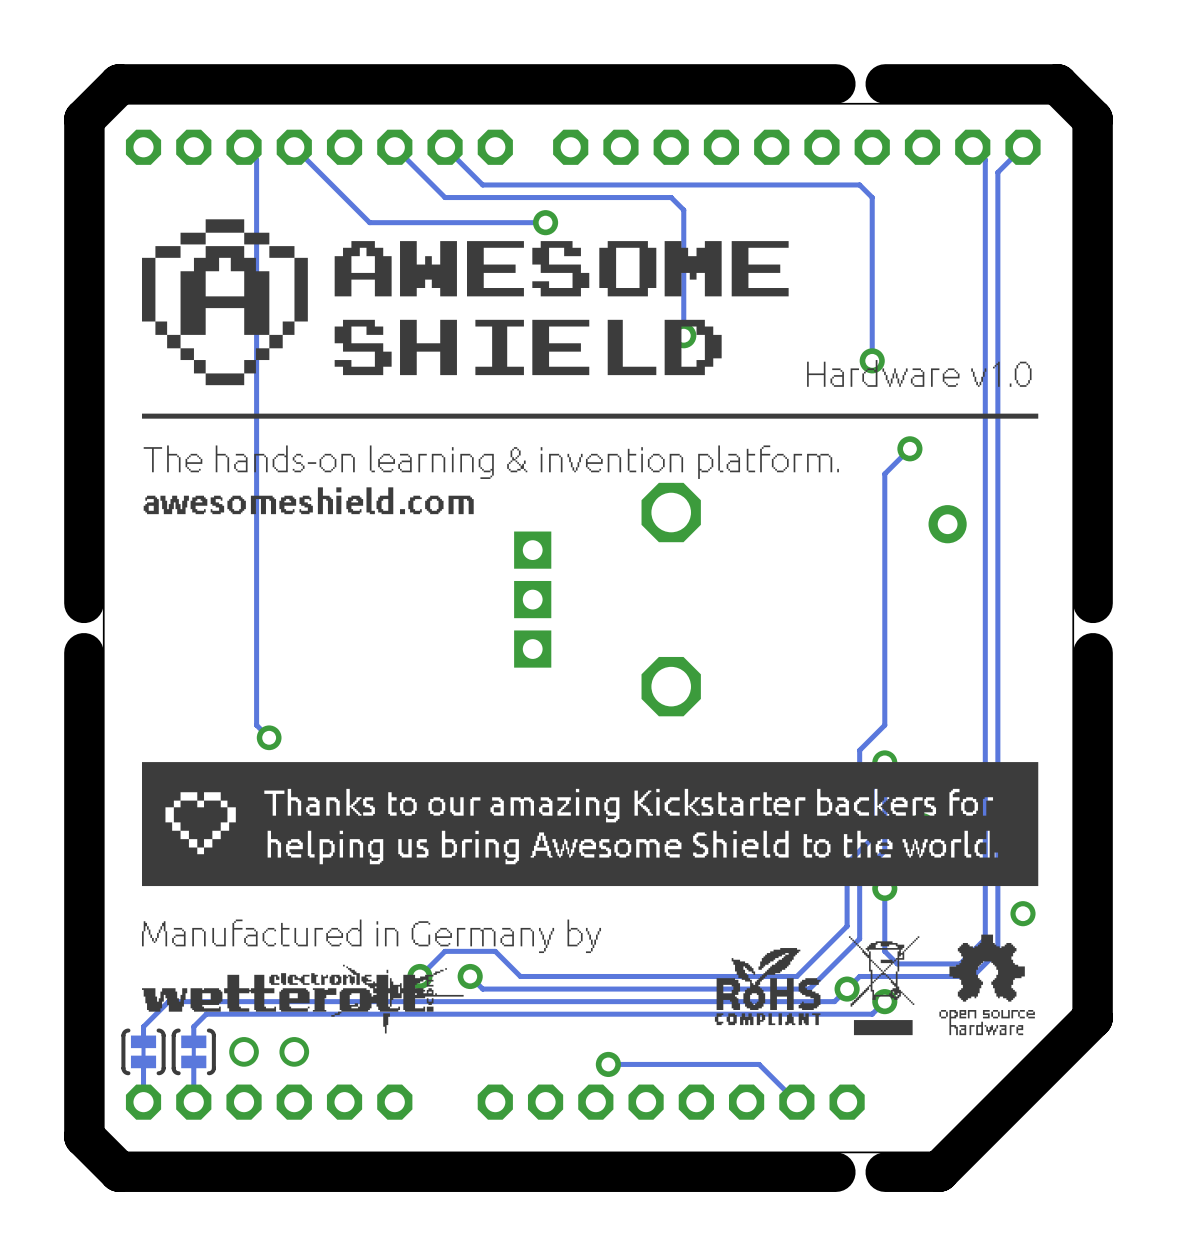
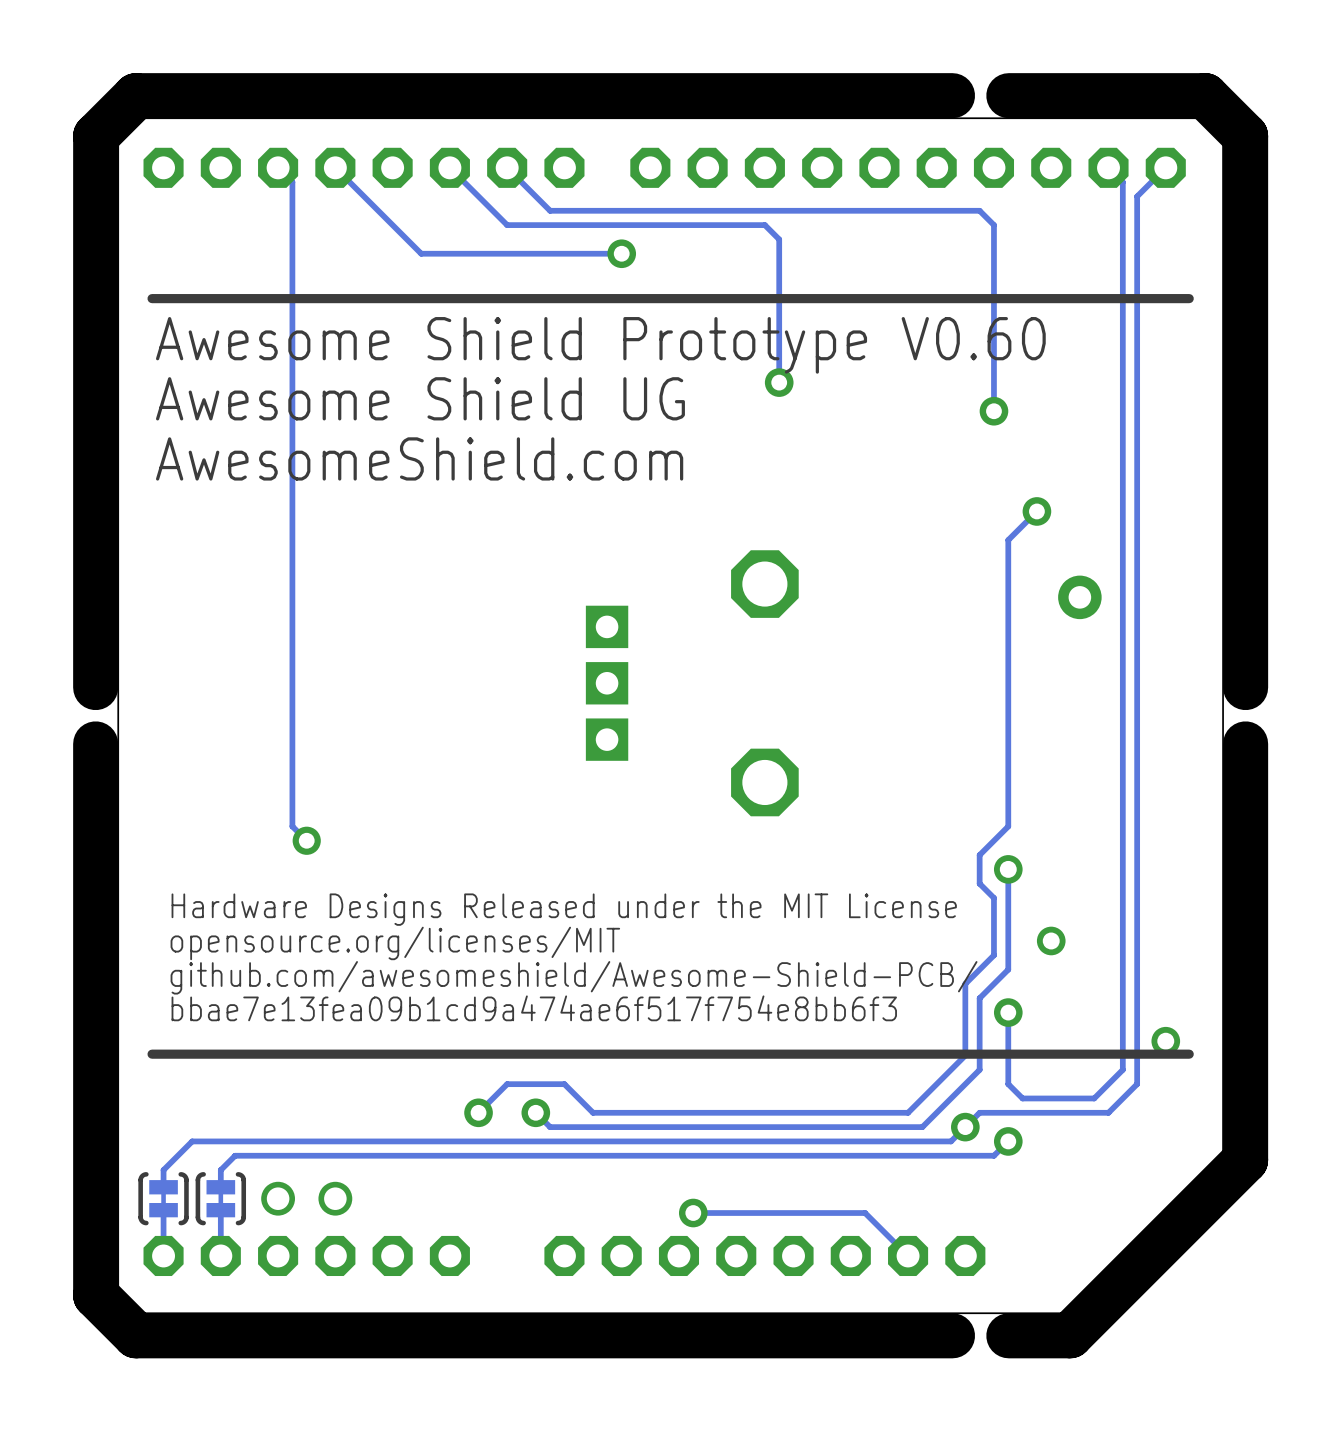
drawing: [141, 219, 308, 386] -> none
drawing: [334, 241, 789, 376] -> none
line: none -> (1189, 298) (152, 298)
text: none -> Awesome Shield Prototype V0.60 (600, 345)
text: none -> Awesome Shield UG (420, 398)
drawing: [807, 360, 1032, 387] -> none
text: none -> AwesomeShield.com (419, 458)
drawing: [141, 413, 1039, 419] -> none
drawing: [143, 445, 839, 515] -> none
drawing: [141, 762, 1039, 887] -> none
text: none -> Hardware Designs Released under the MIT License (564, 909)
text: none -> opensource.org/licenses/MIT (395, 943)
text: none -> github.com/awesomeshield/Awesome-Shield-PCB/ (574, 977)
text: none -> bbae7e13fea09b1cd9a474ae6f517f754e8bb6f3 (534, 1008)
drawing: [141, 919, 602, 1034] -> none
line: none -> (1189, 1054) (152, 1054)
drawing: [939, 934, 1035, 1036] -> none
drawing: [848, 936, 920, 1036] -> none
drawing: [714, 948, 821, 1026] -> none

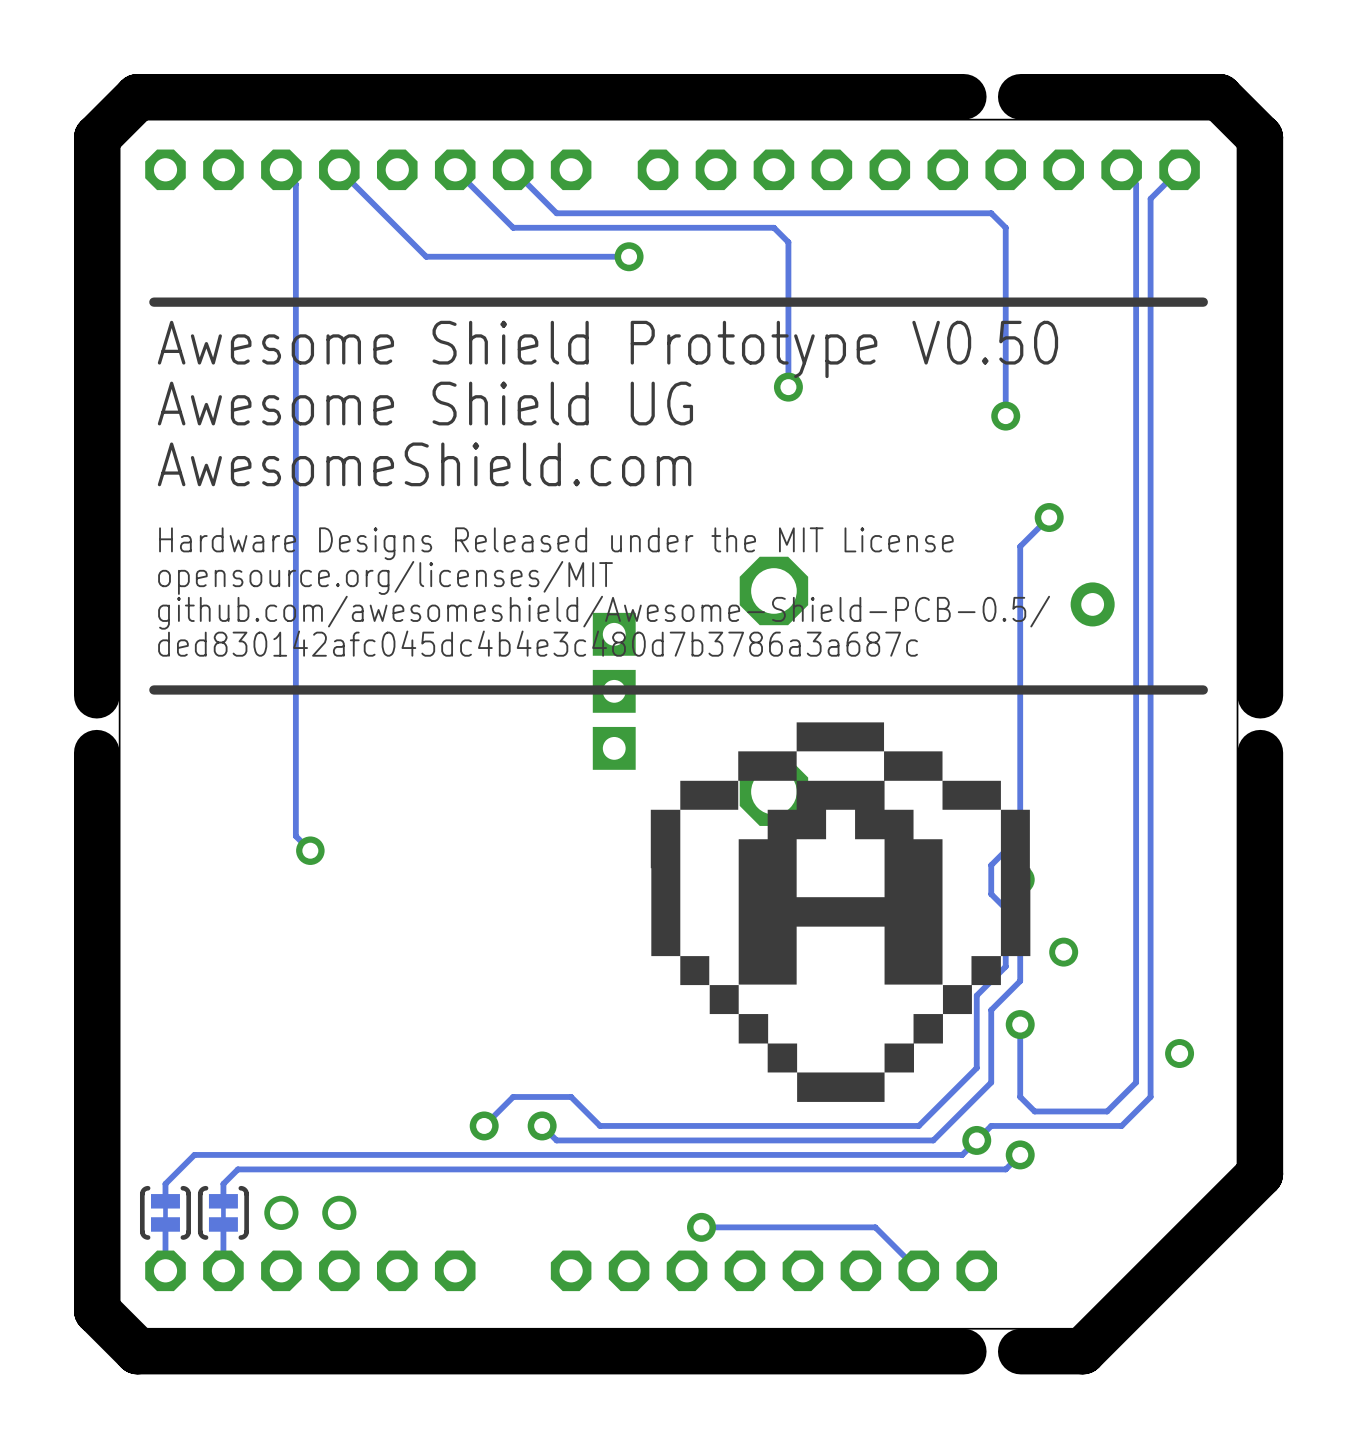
text: Awesome Shield Prototype V0.60 (600, 345) -> Awesome Shield Prototype V0.50 (607, 349)
text: none -> github.com/awesomeshield/Awesome-Shield-PCB-0.5/ (604, 612)
text: none -> ded830142afc045dc4b4e3c480d7b3786a3a687c (538, 643)
drawing: none -> [650, 722, 1031, 1102]
text position: Hardware Designs Released under the MIT License (564, 909) -> Hardware Designs Released under the MIT License (556, 543)
text position: opensource.org/licenses/MIT (395, 943) -> opensource.org/licenses/MIT (385, 577)
text: github.com/awesomeshield/Awesome-Shield-PCB/ (574, 977) -> none
text: bbae7e13fea09b1cd9a474ae6f517f754e8bb6f3 (534, 1008) -> none
line: (1189, 1054) (152, 1054) -> (1203, 689) (153, 689)

